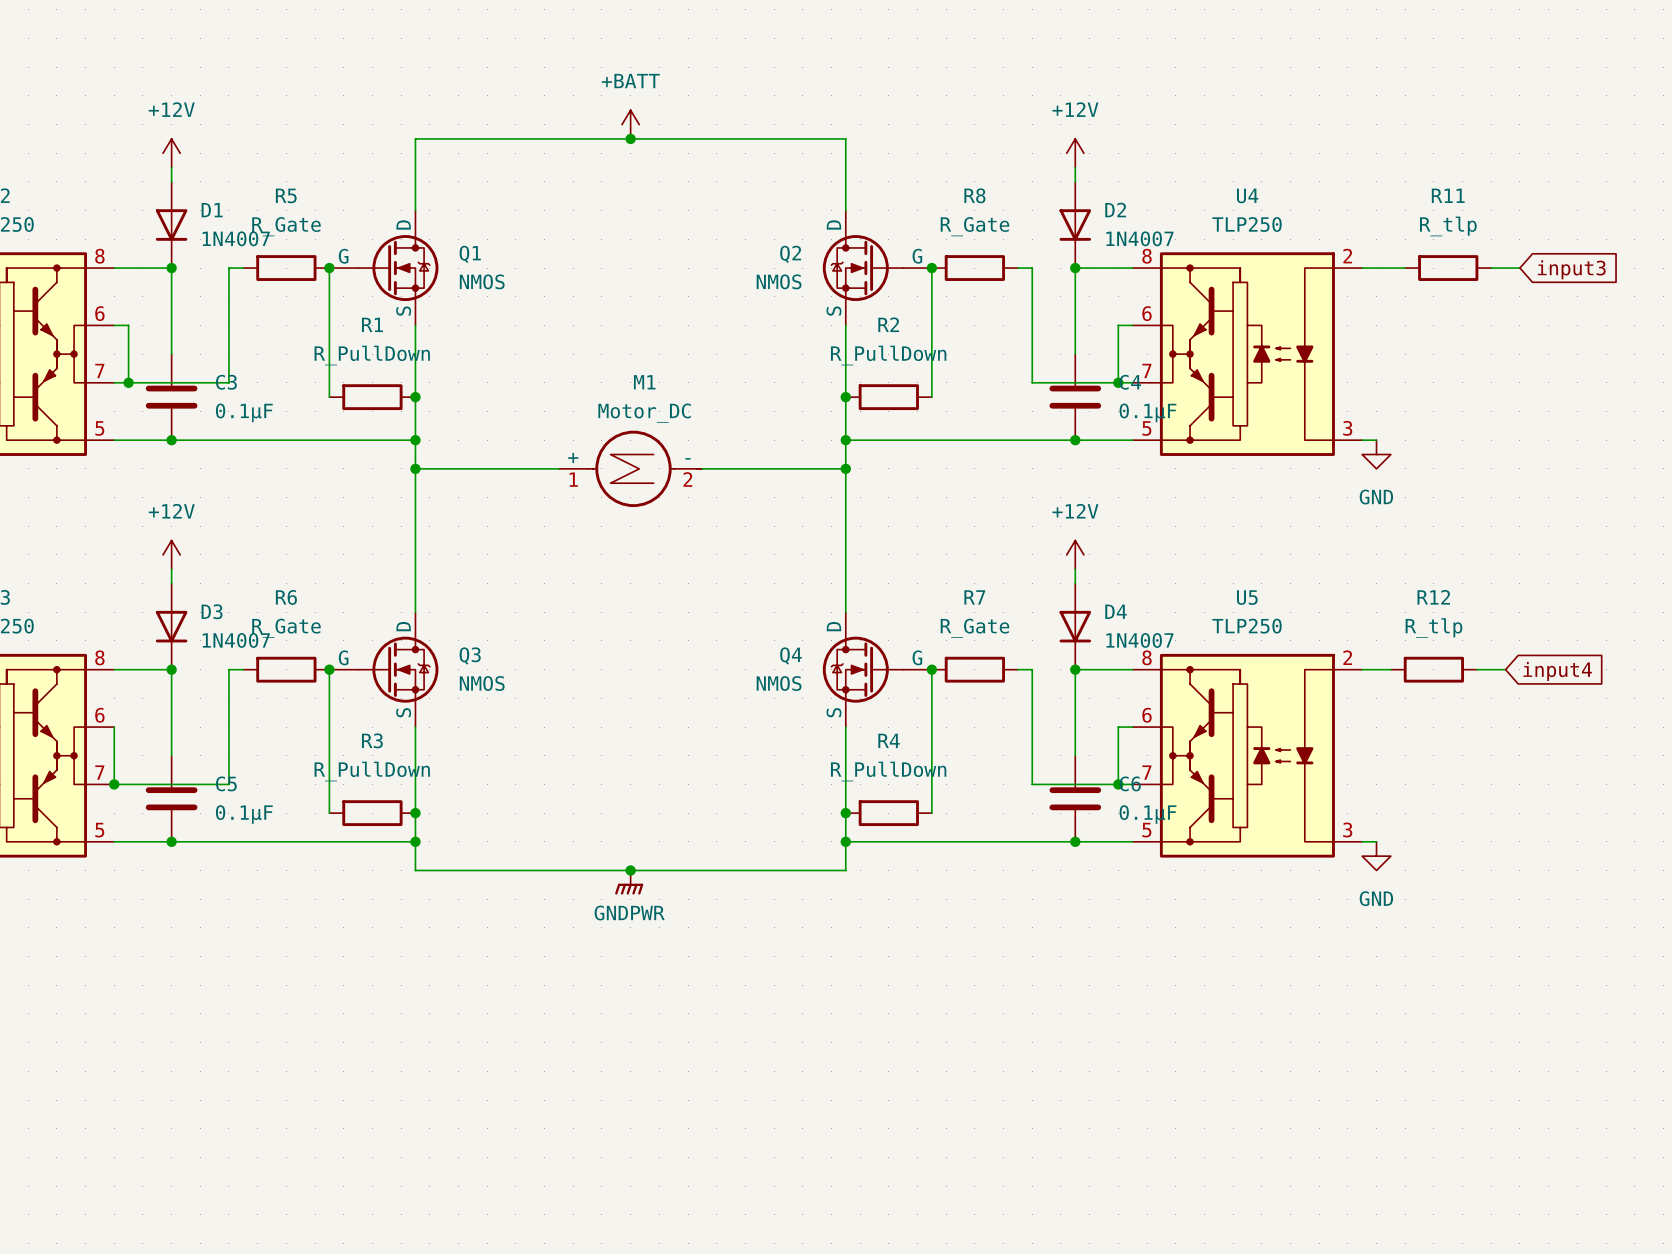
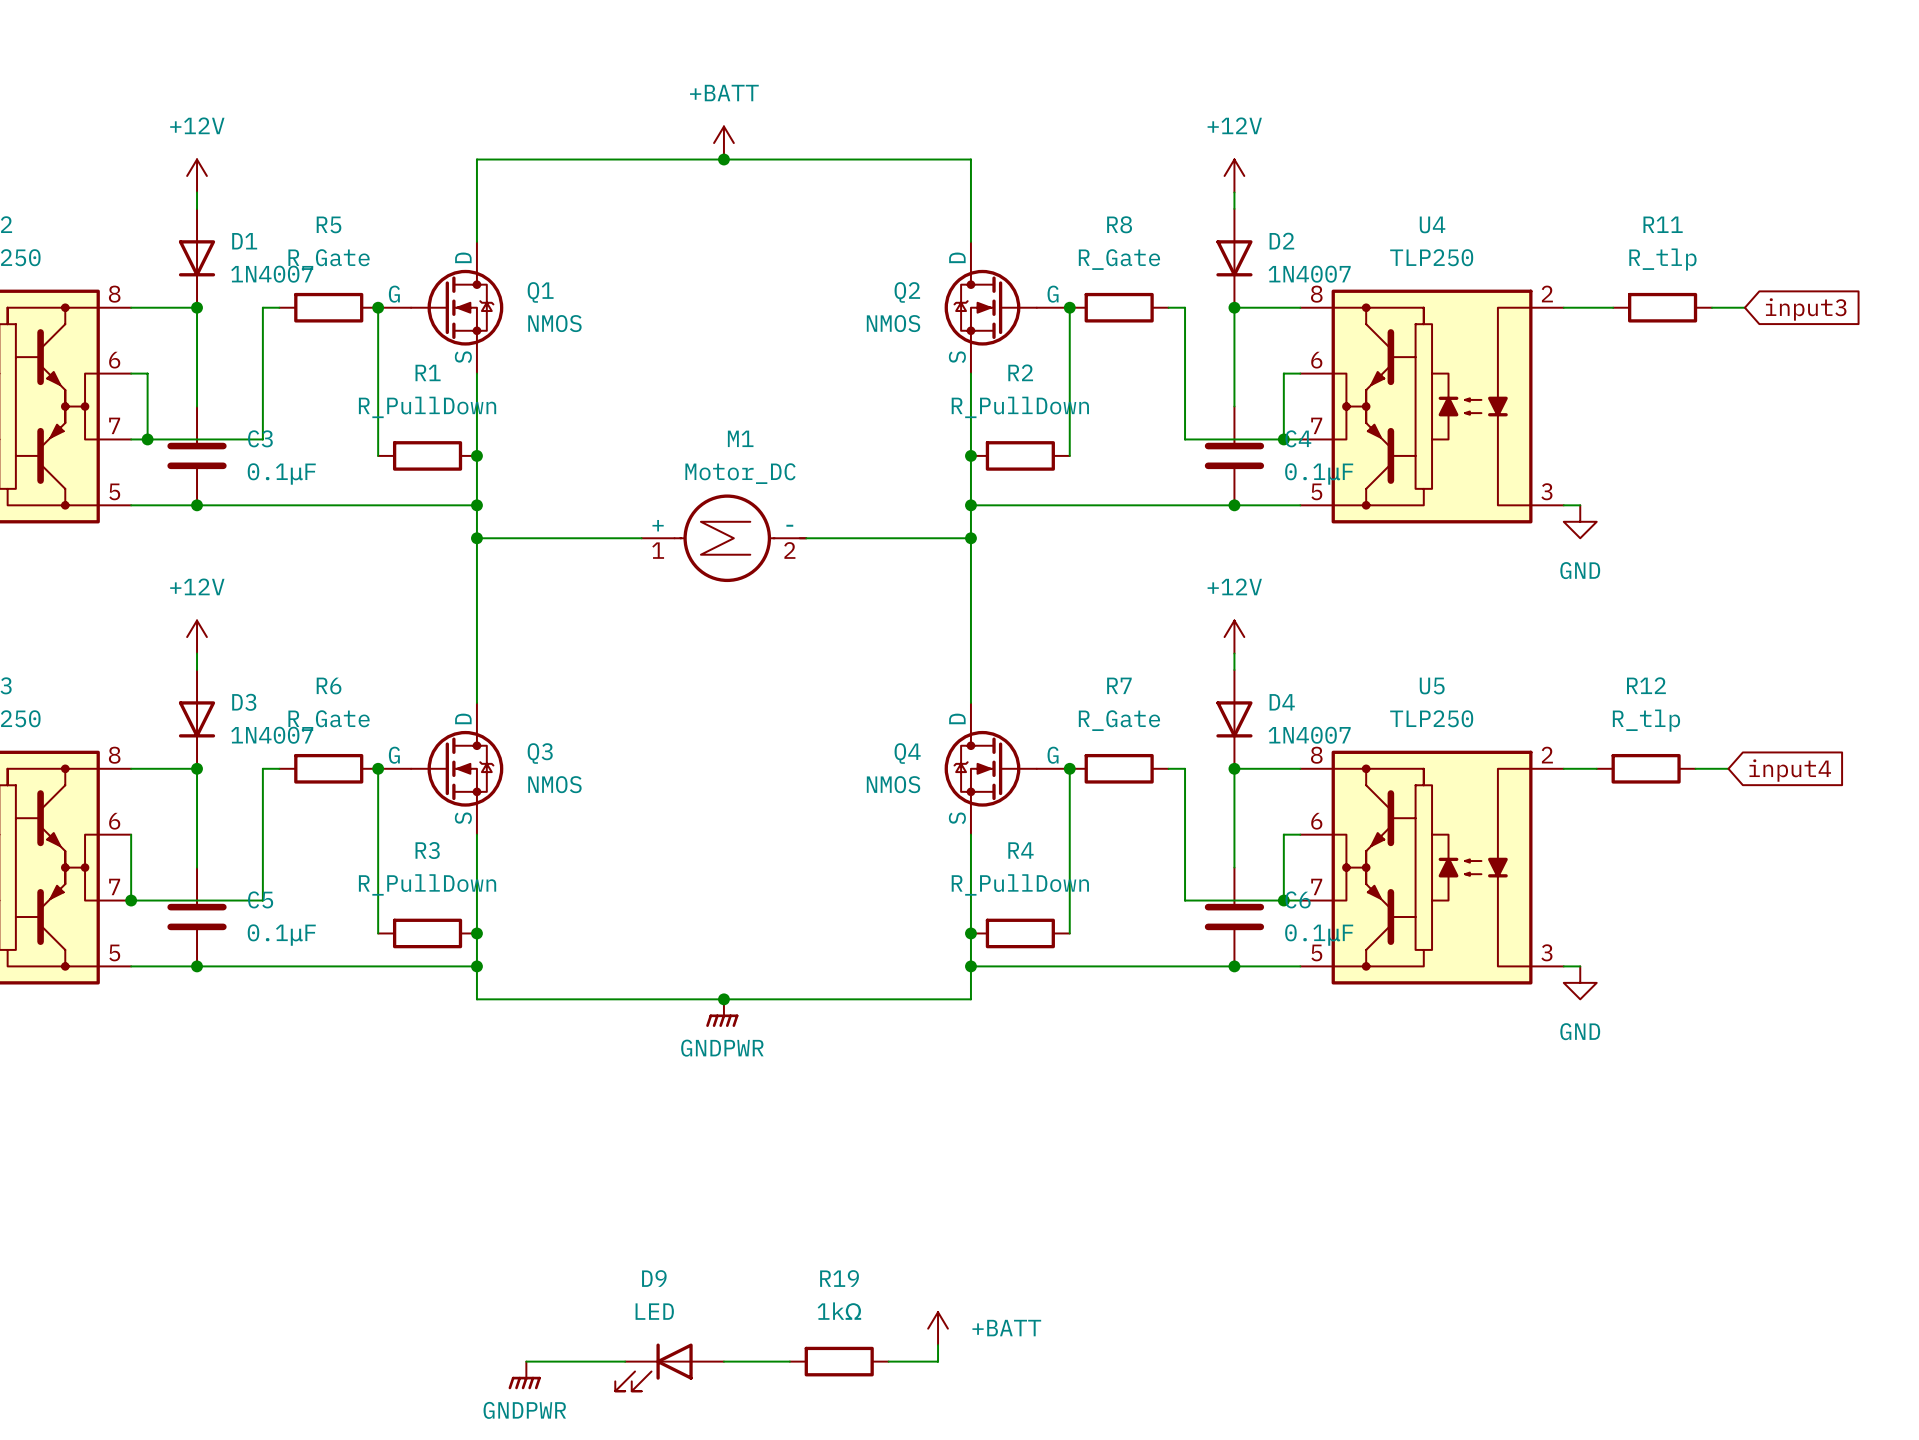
power symbol: none -> +BATT (938, 1328)
wire: none -> (938, 1345) (938, 1361) (888, 1361)
wire: none -> (526, 1361) (625, 1361)
wire: none -> (723, 1361) (789, 1361)
R19: none -> 1kΩ (839, 1361)
D9: none -> LED (669, 1367)
power symbol: none -> GNDPWR (524, 1375)

